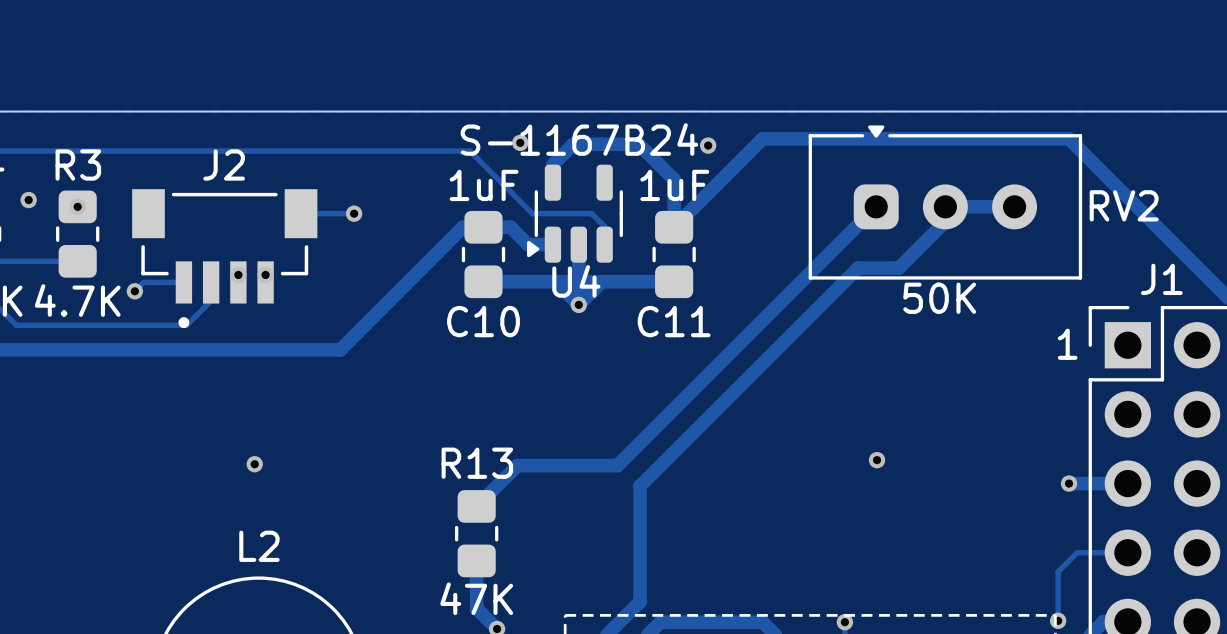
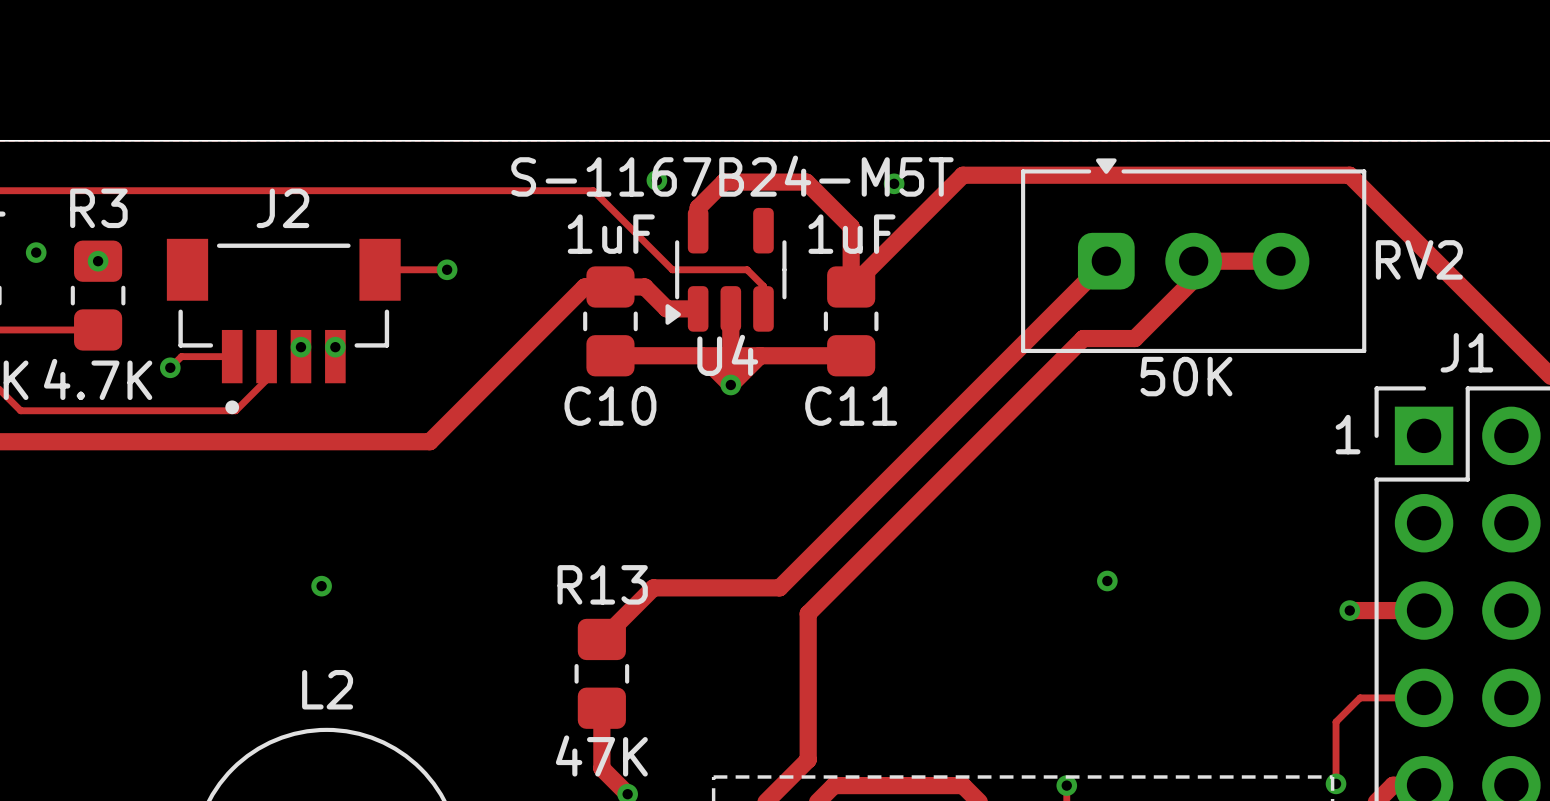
U4 value: S-1167B24 (579, 139) -> S-1167B24-M5T (732, 176)

